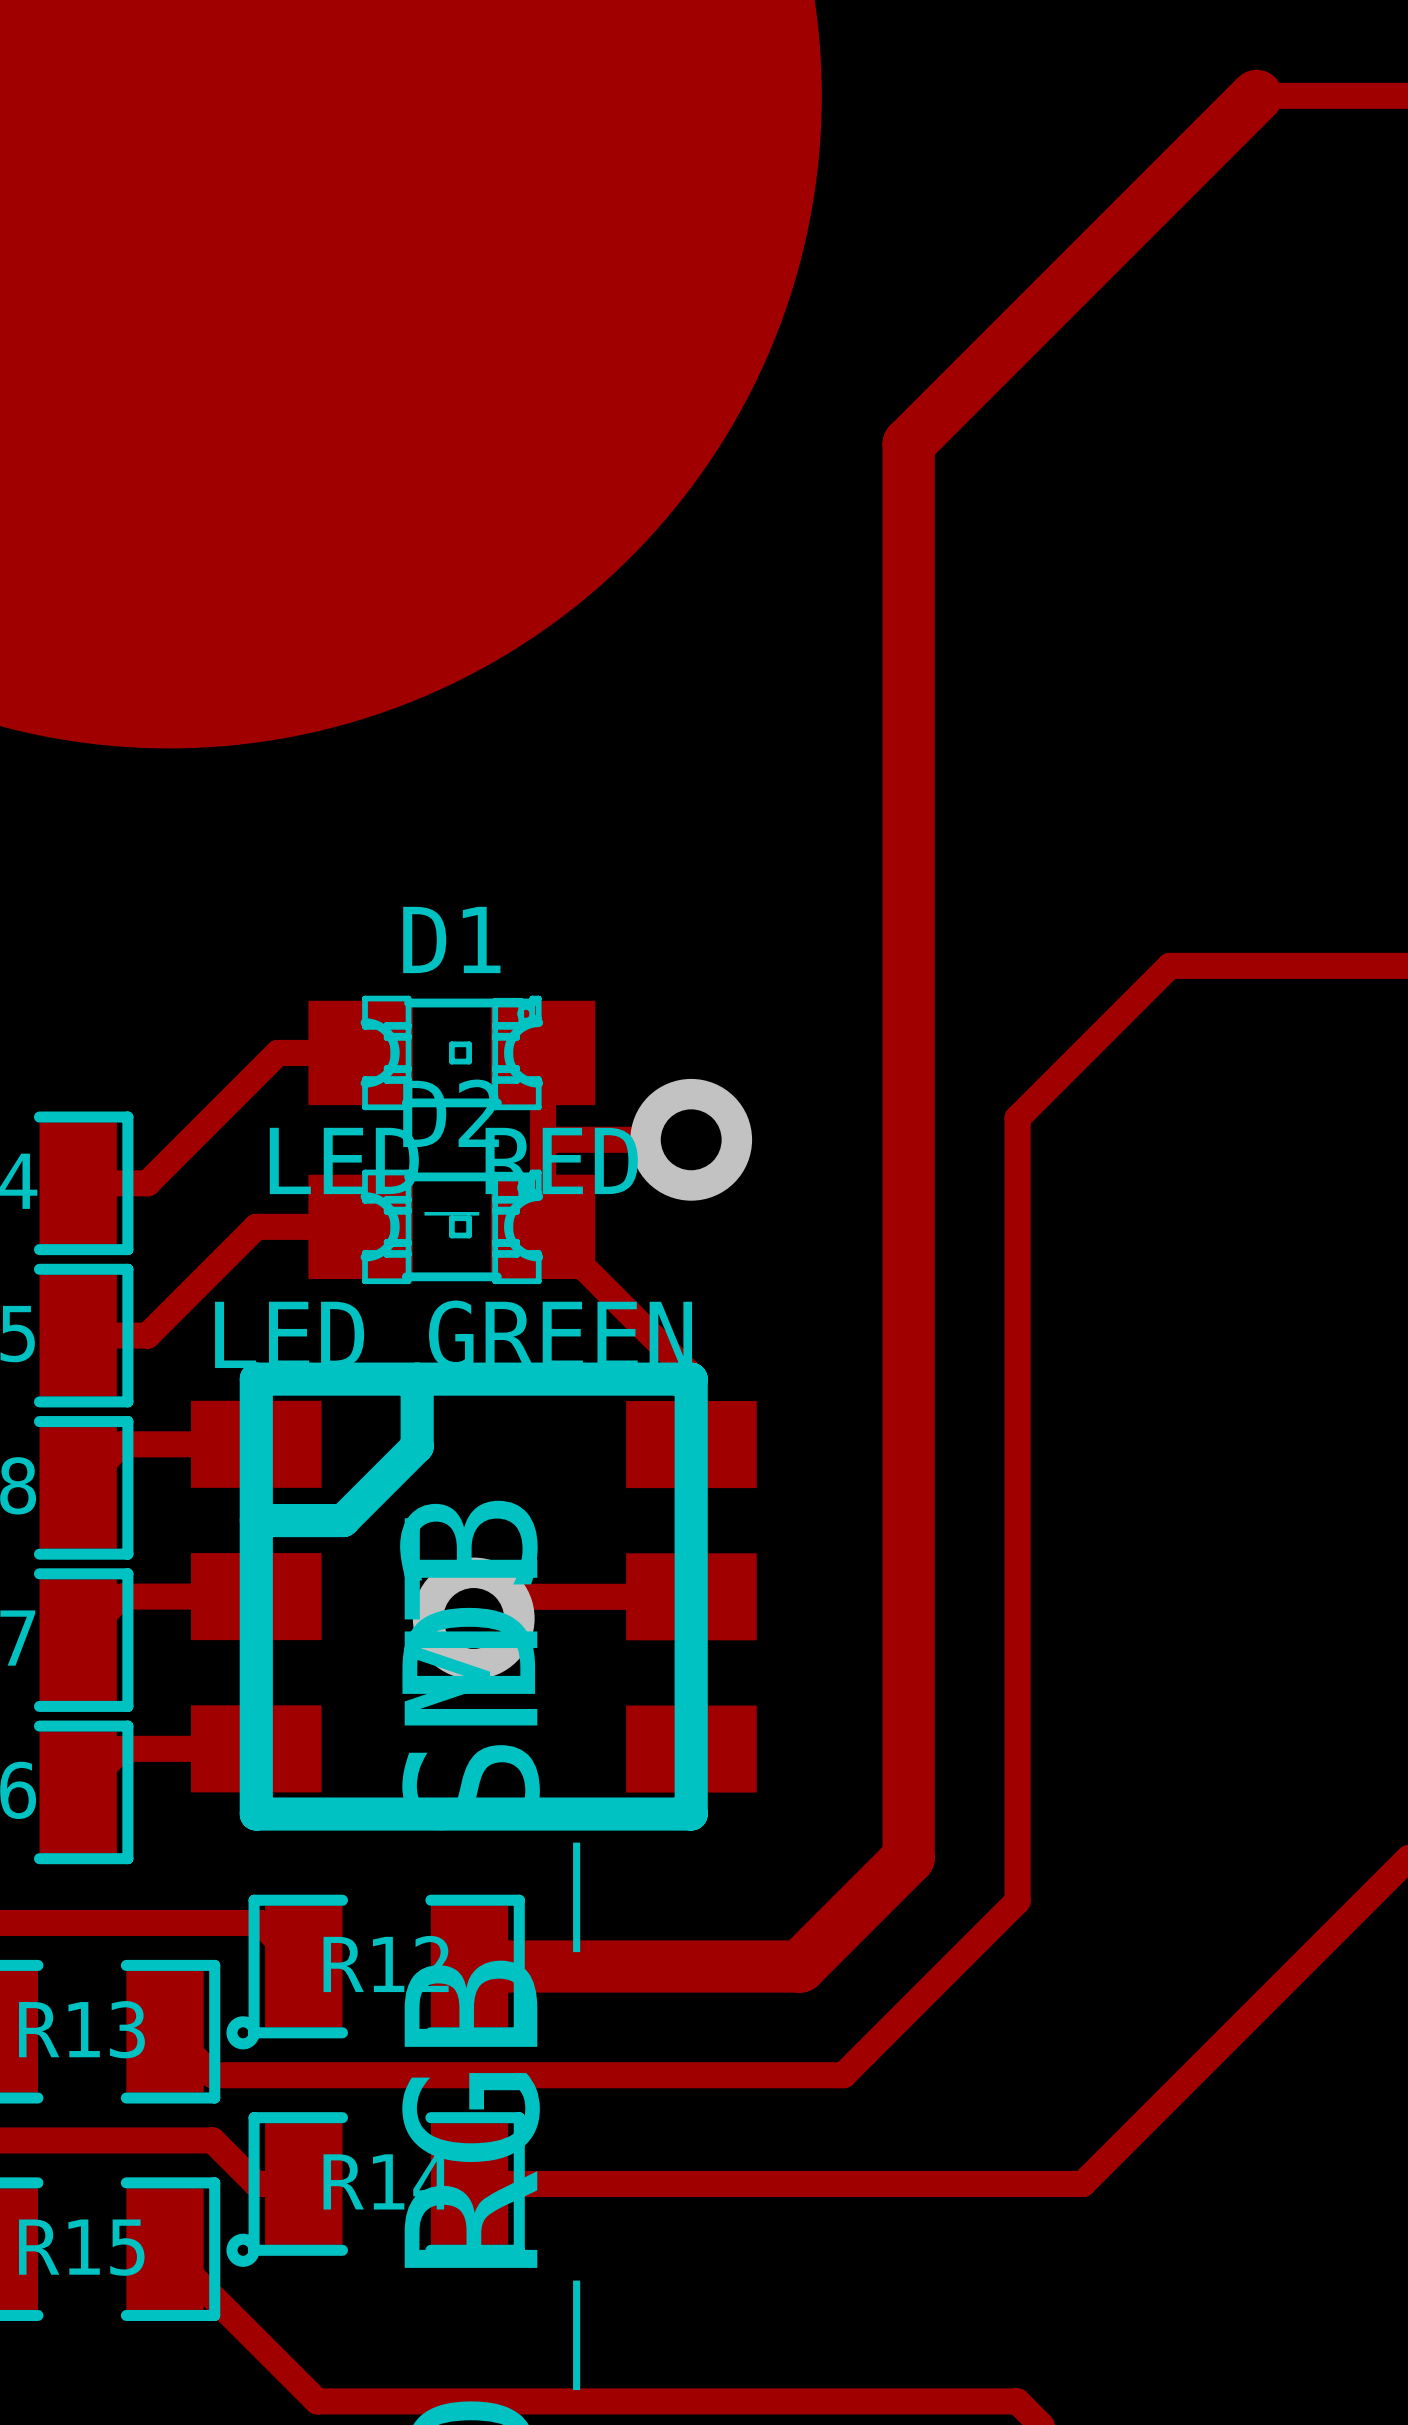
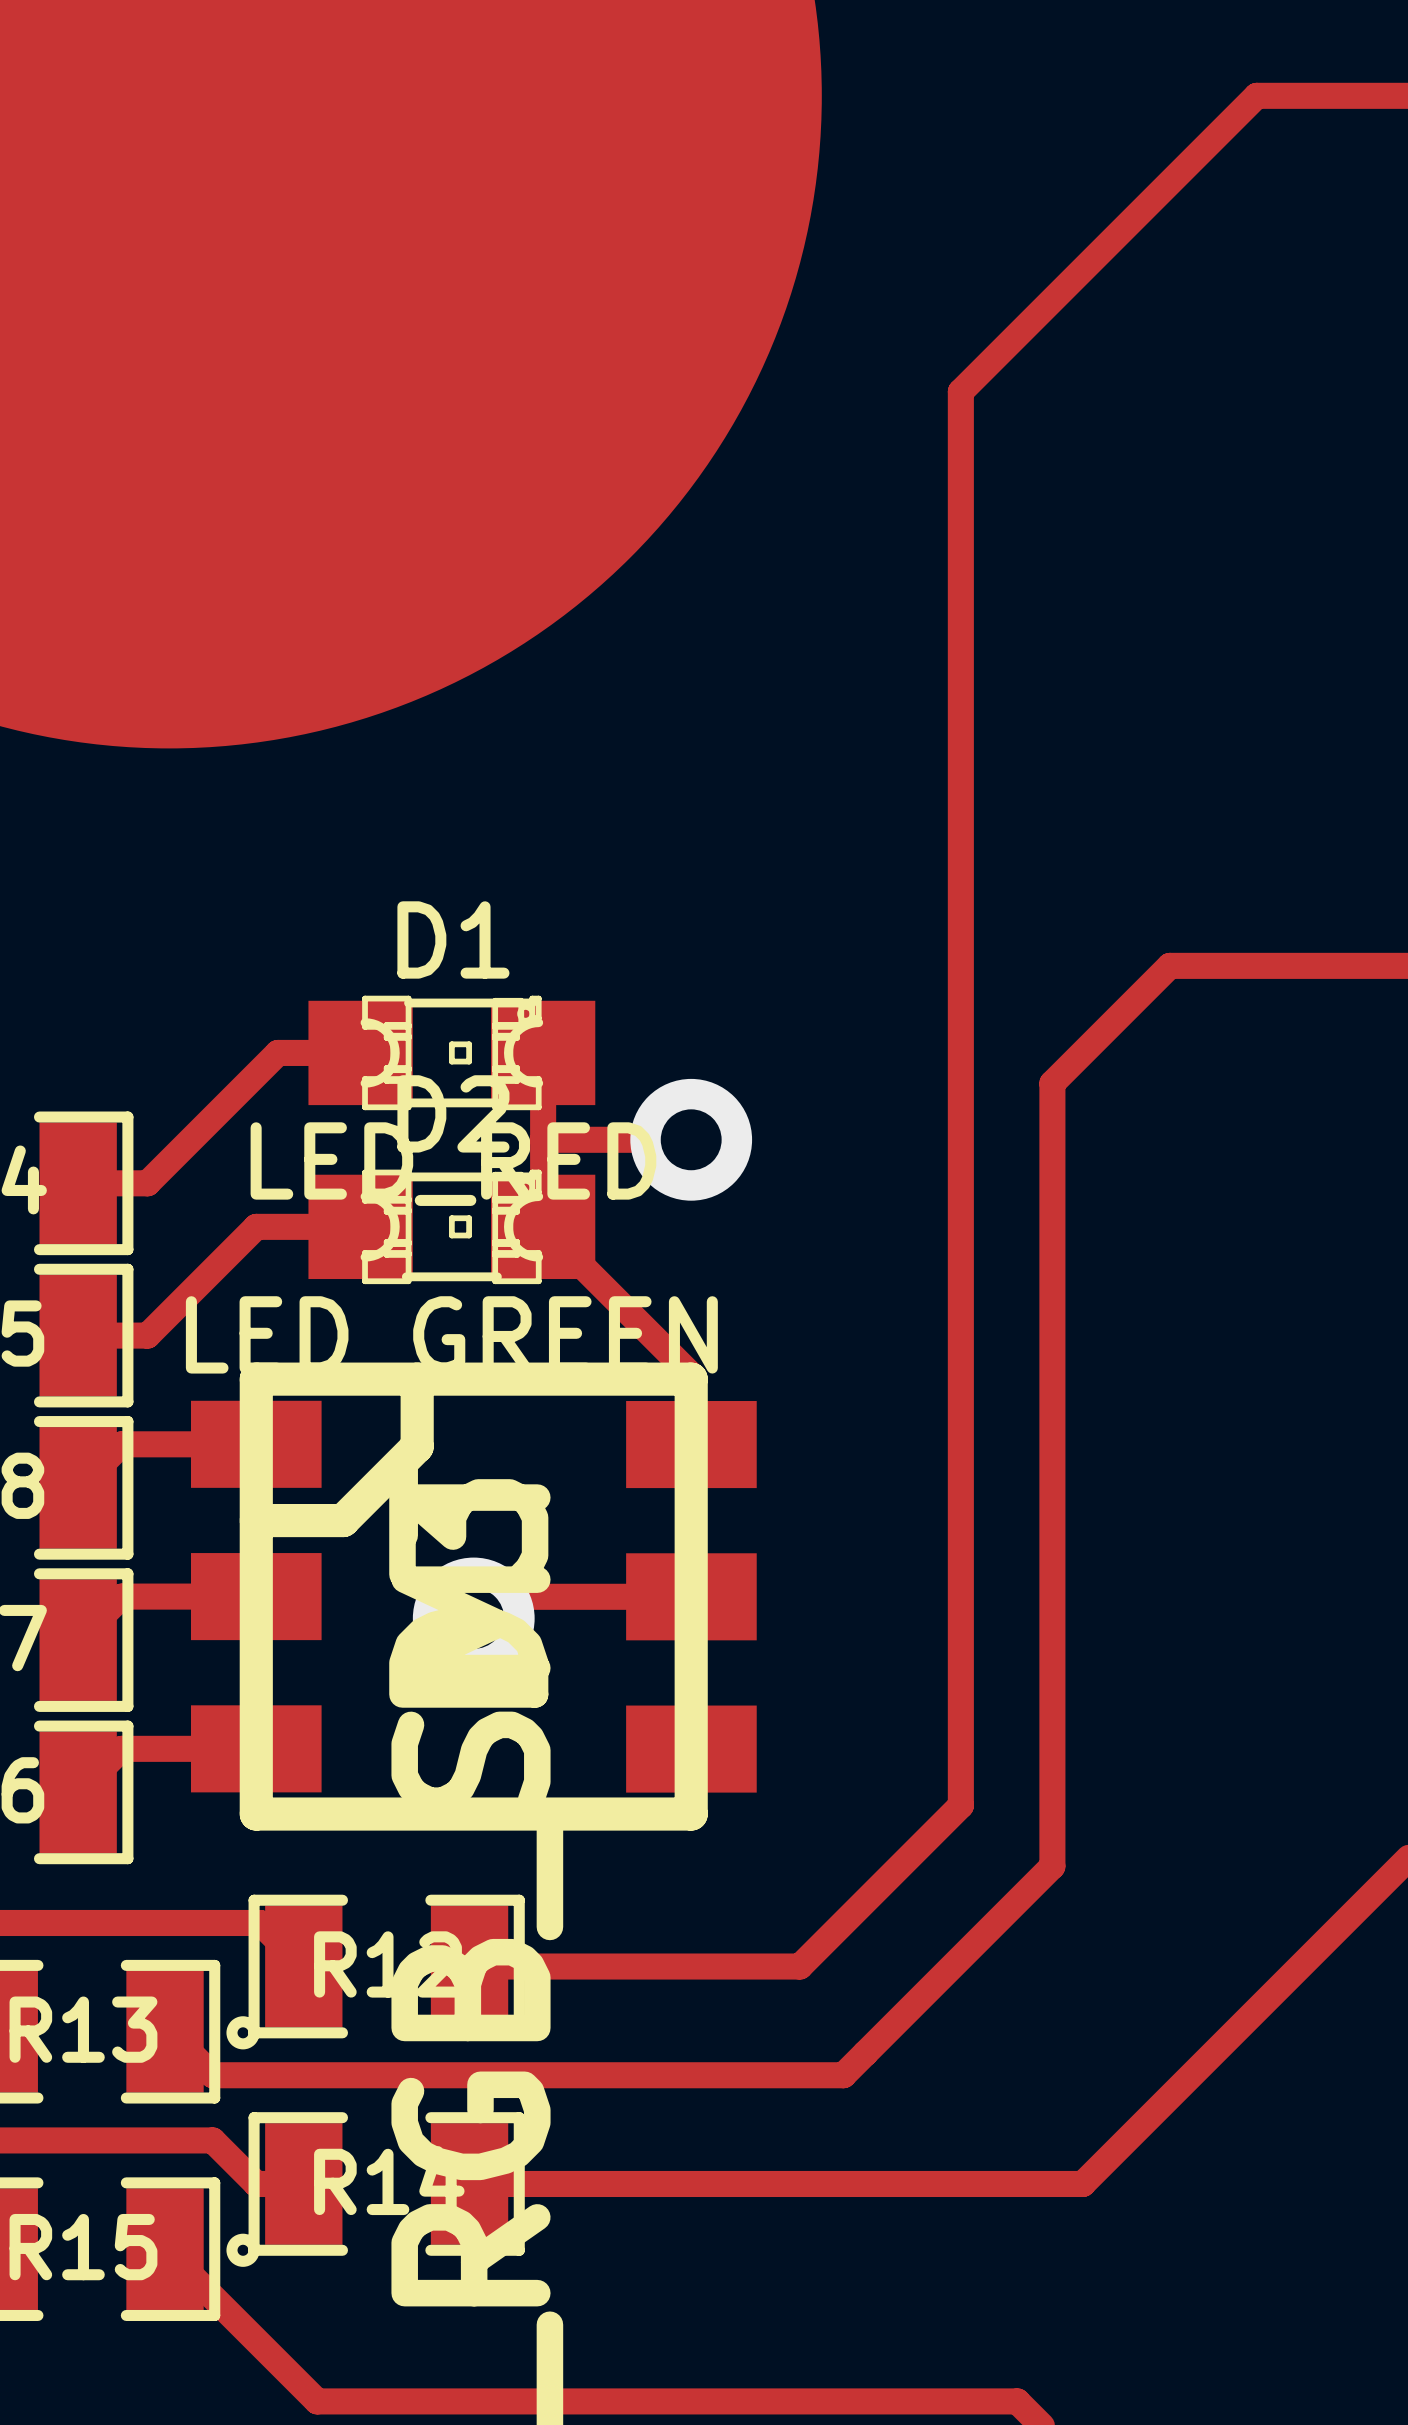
track width: thick (1256, 95) (960, 391) -> thin (1256, 95) (960, 391)
track: (960, 391) (908, 443) (908, 1857) -> (960, 391) (960, 1805) (908, 1857)
track: (1052, 1083) (1017, 1118) (1017, 1901) -> (1052, 1083) (1052, 1866) (1017, 1901)
track width: thick (908, 1857) (799, 1966) (469, 1966) -> thin (908, 1857) (799, 1966) (469, 1966)

